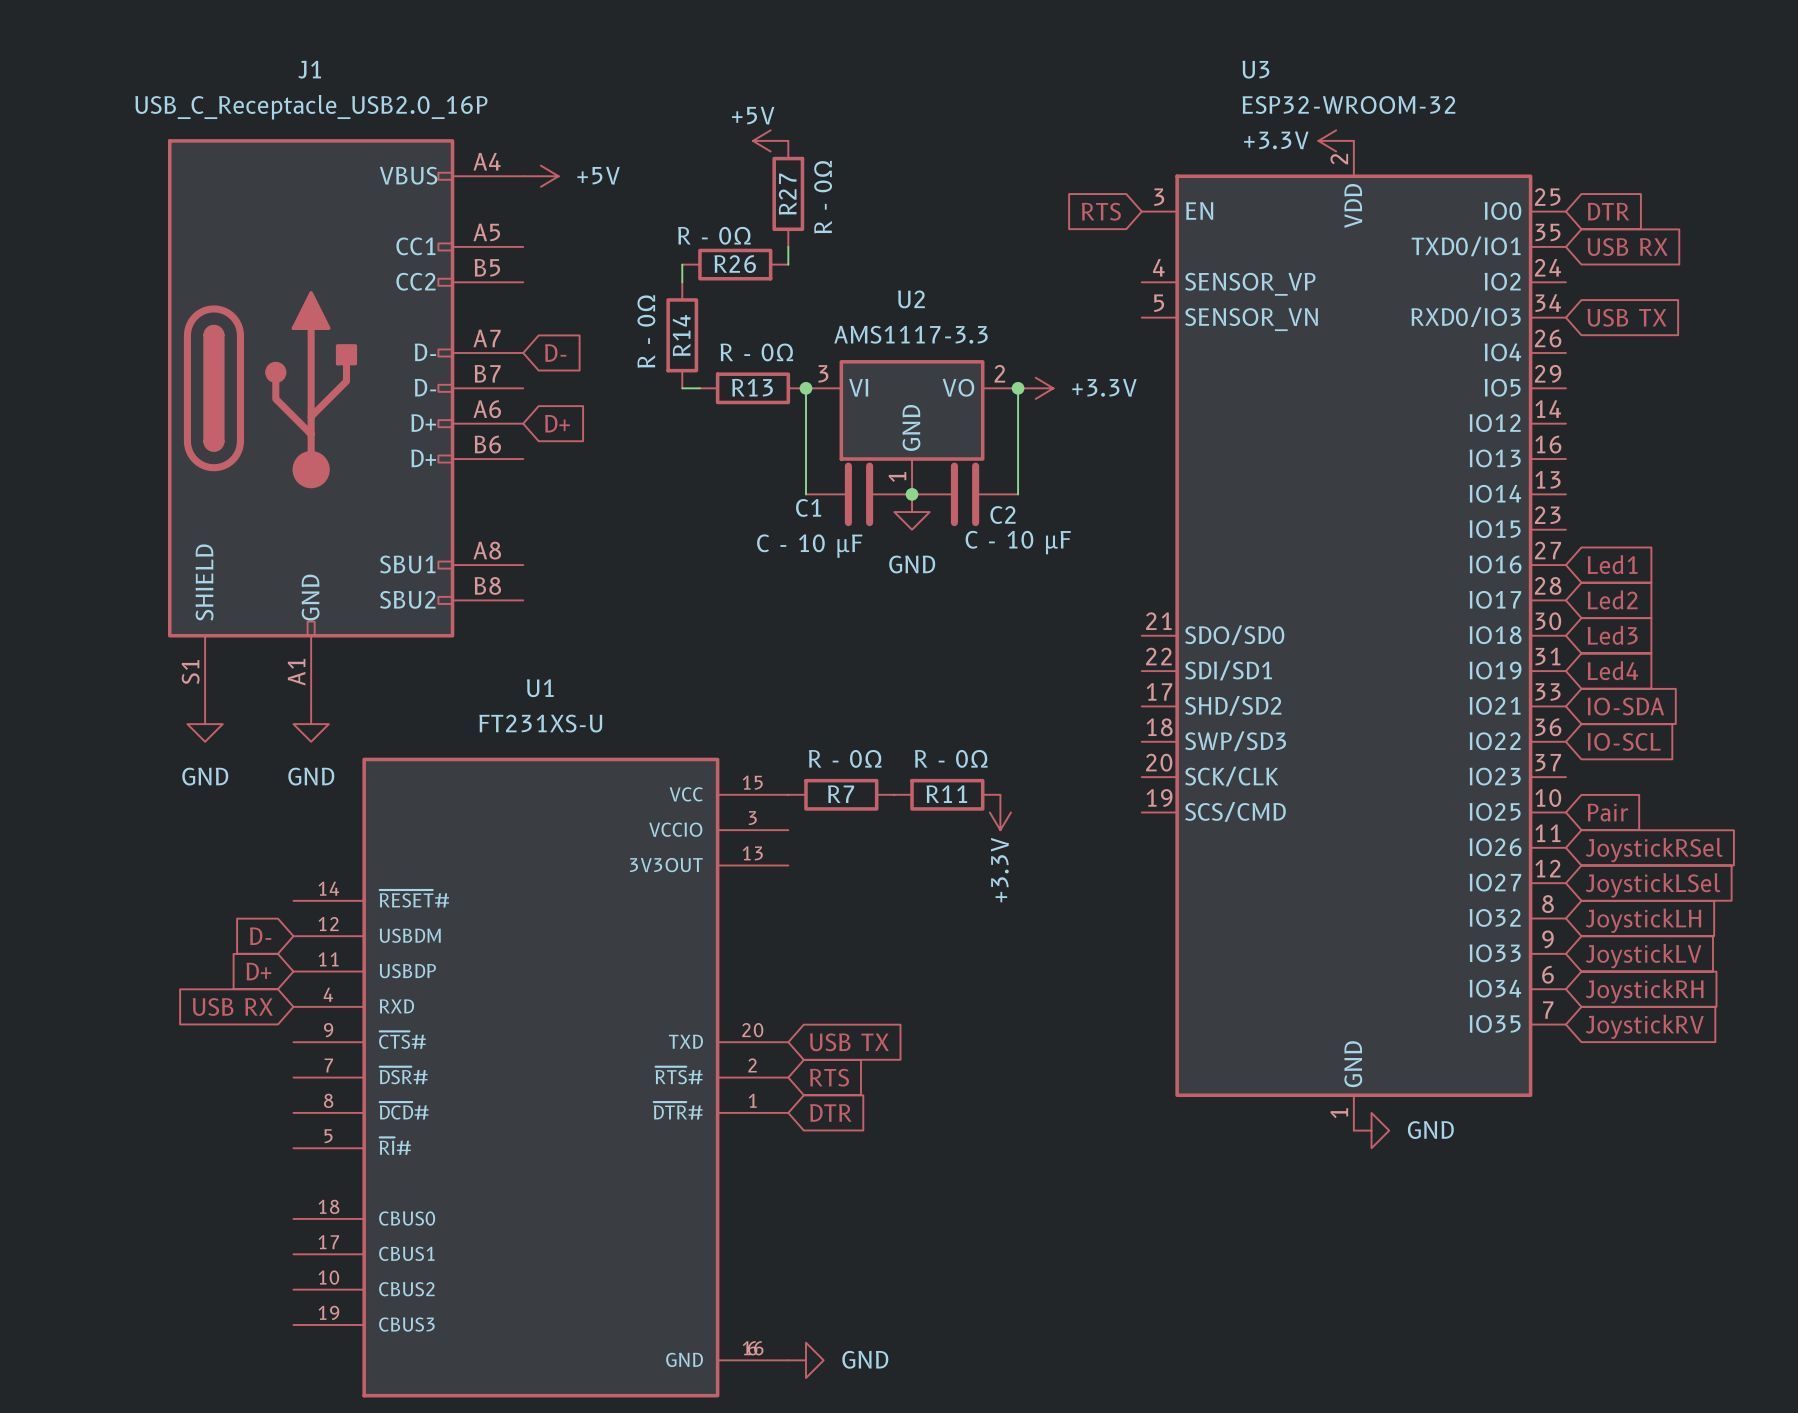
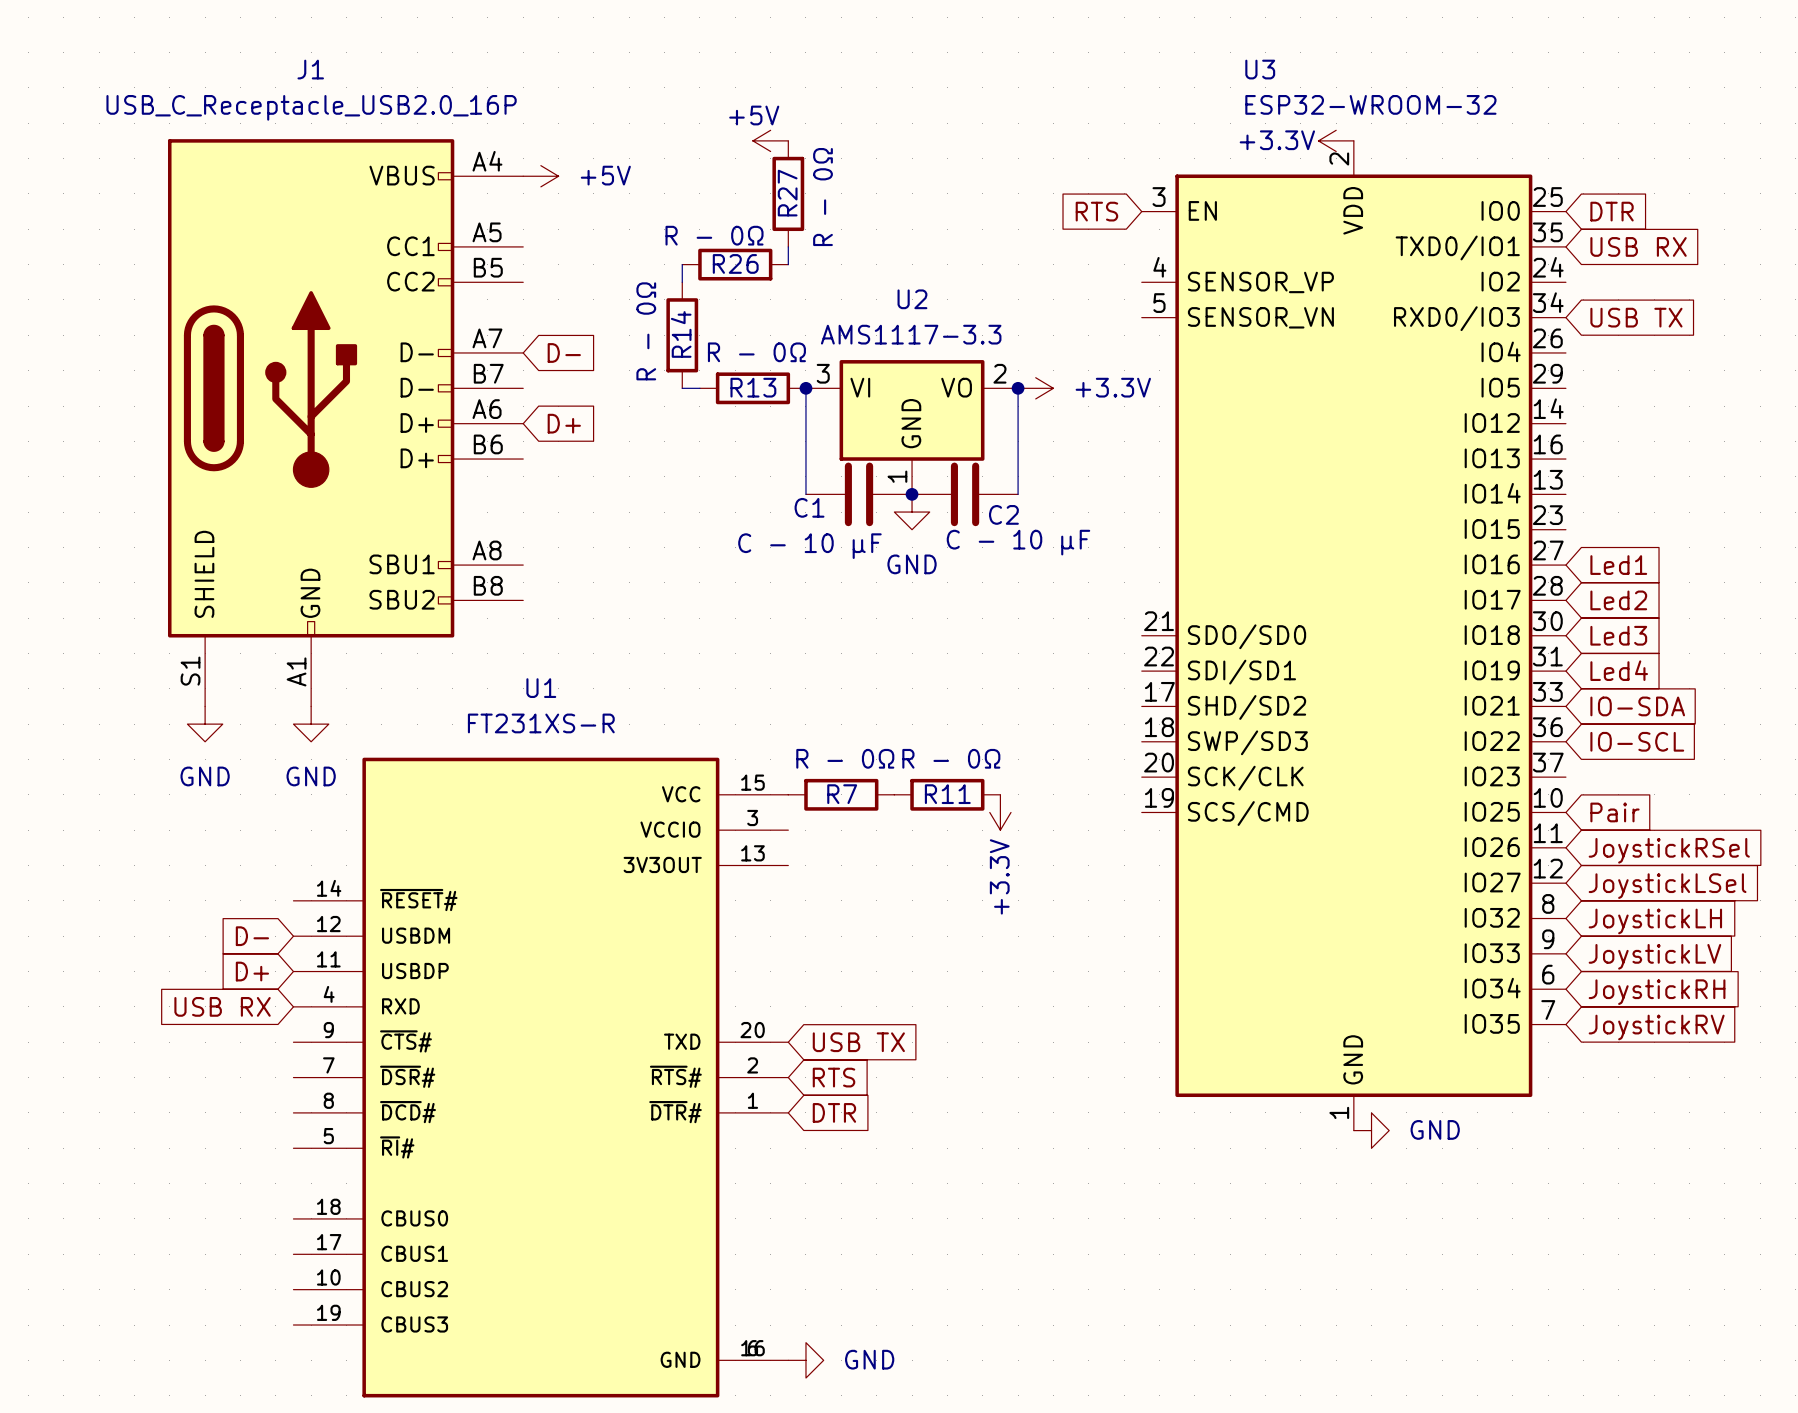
U1 value: FT231XS-U (540, 723) -> FT231XS-R (541, 723)

